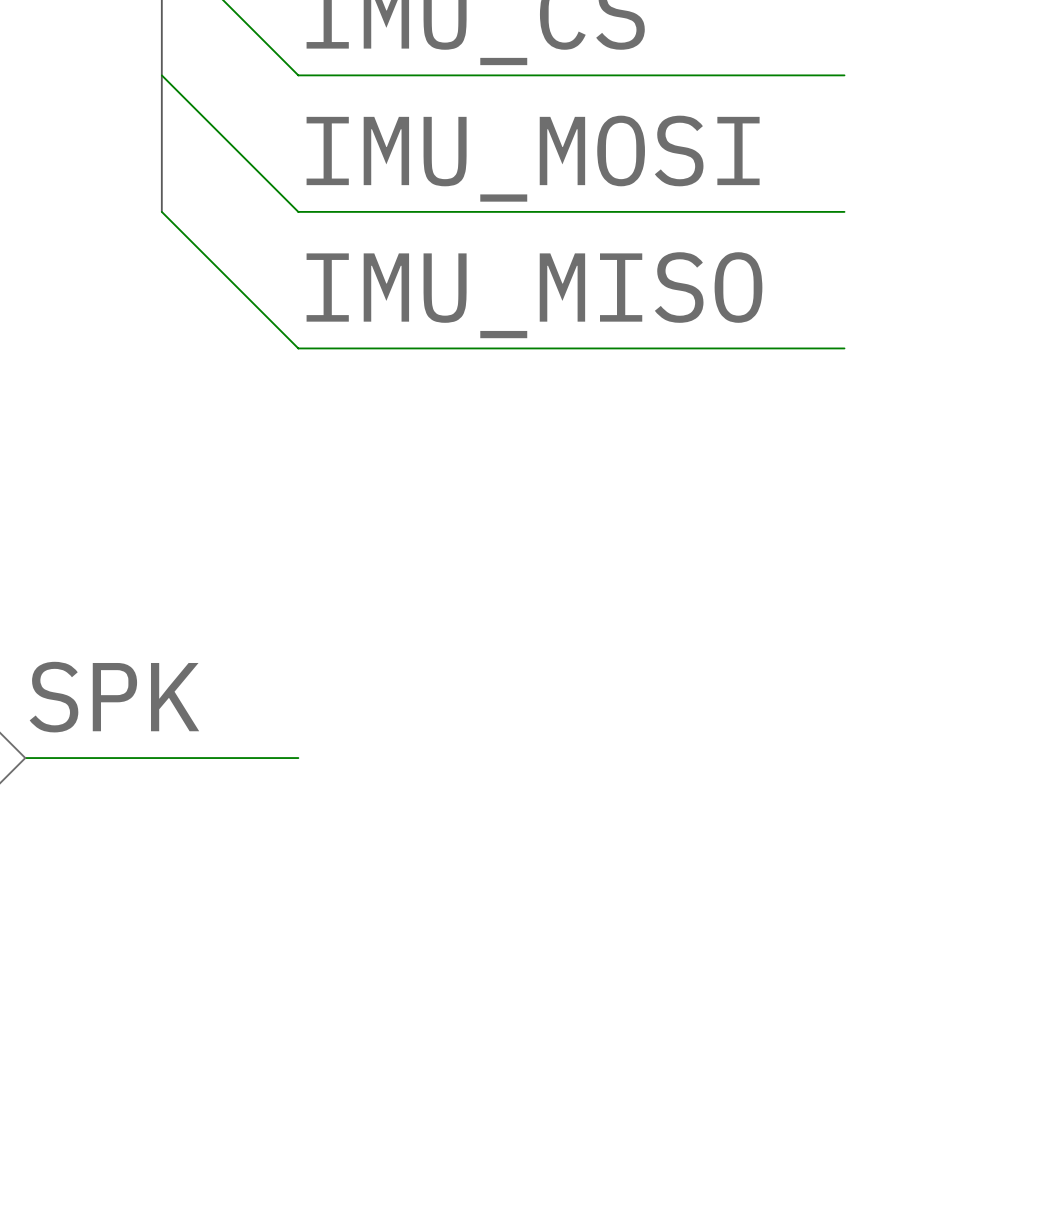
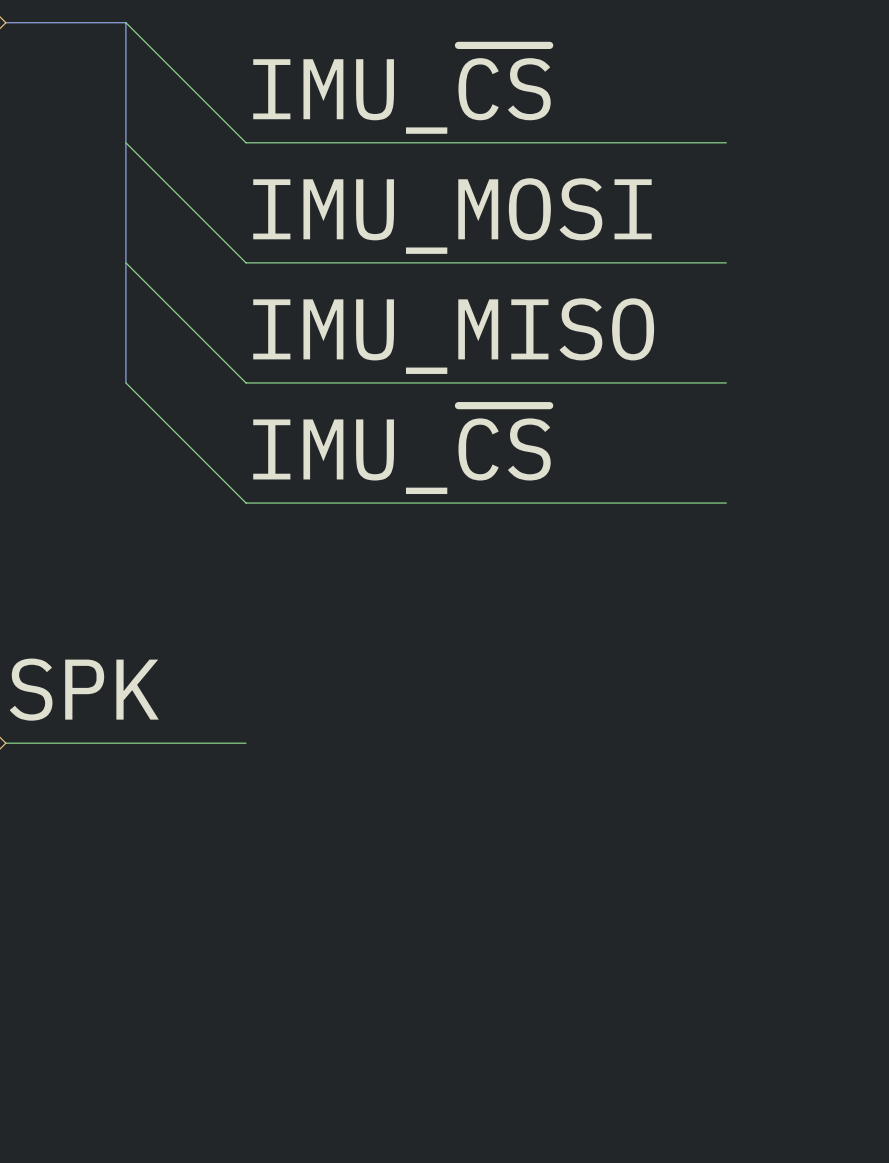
bus: none -> (125, 262) (125, 382)
wire: none -> (125, 382) (246, 503) (726, 503)
label: none -> IMU_~{CS} (401, 449)

